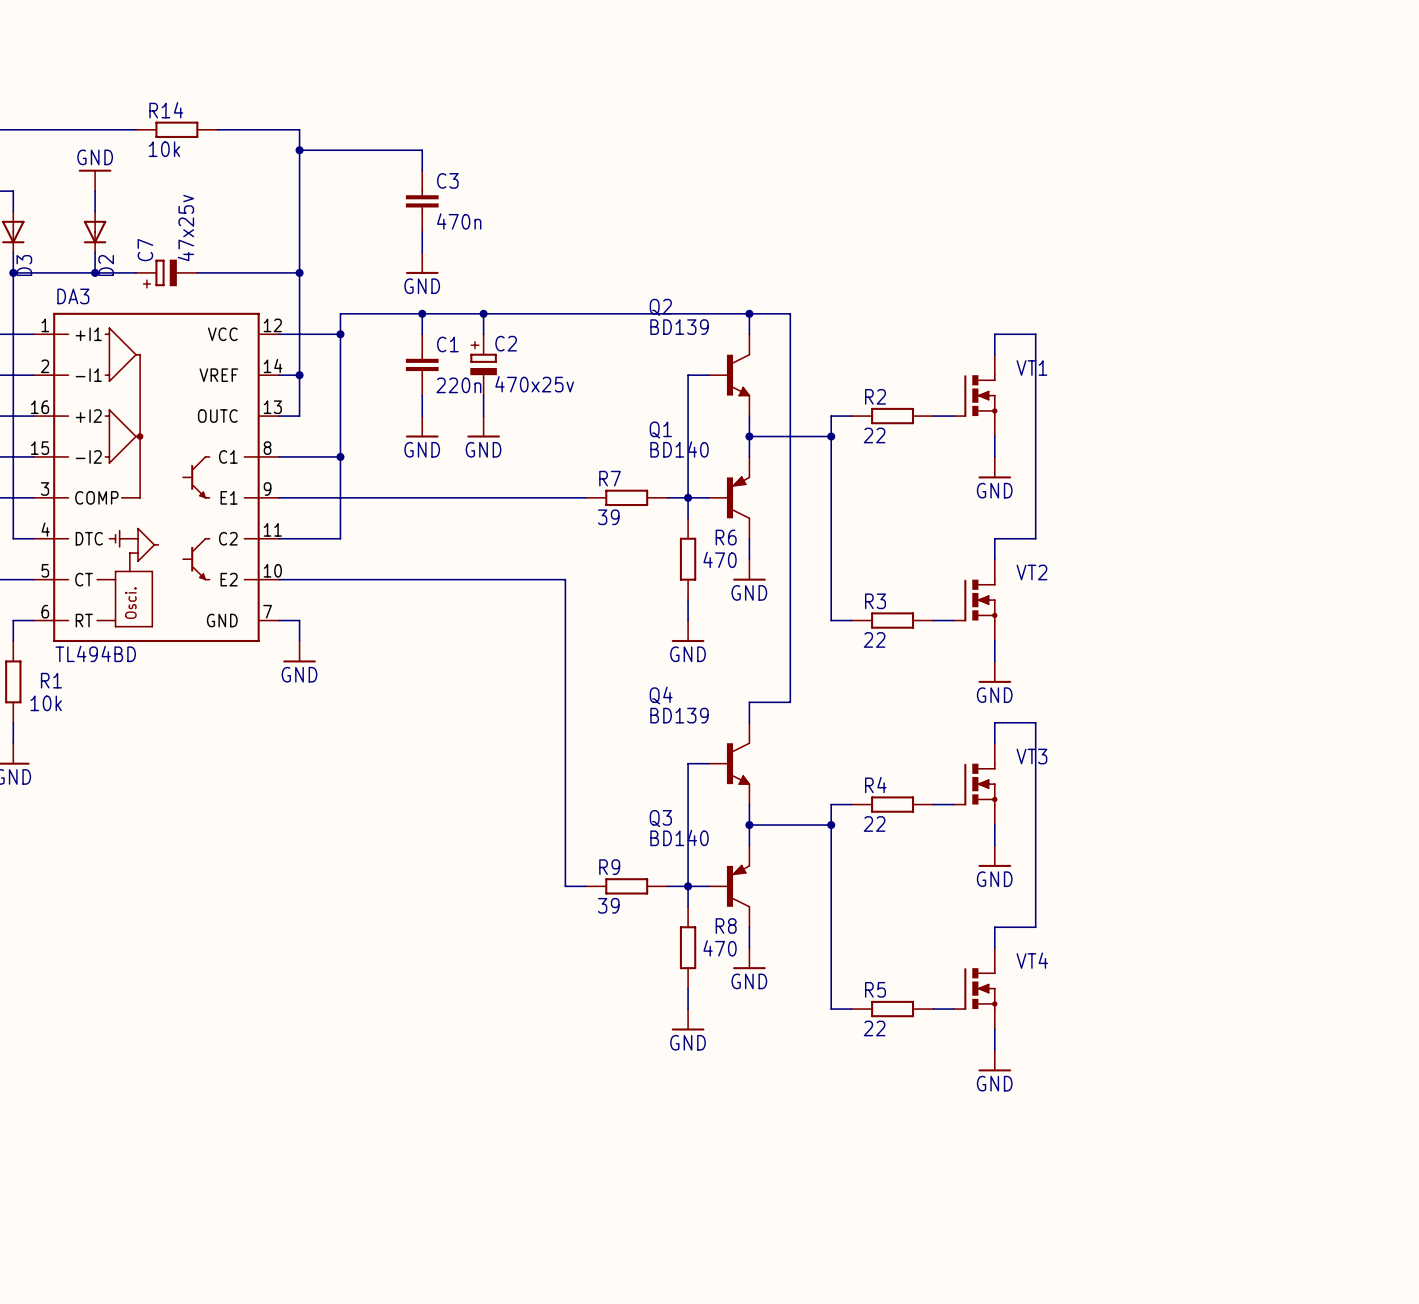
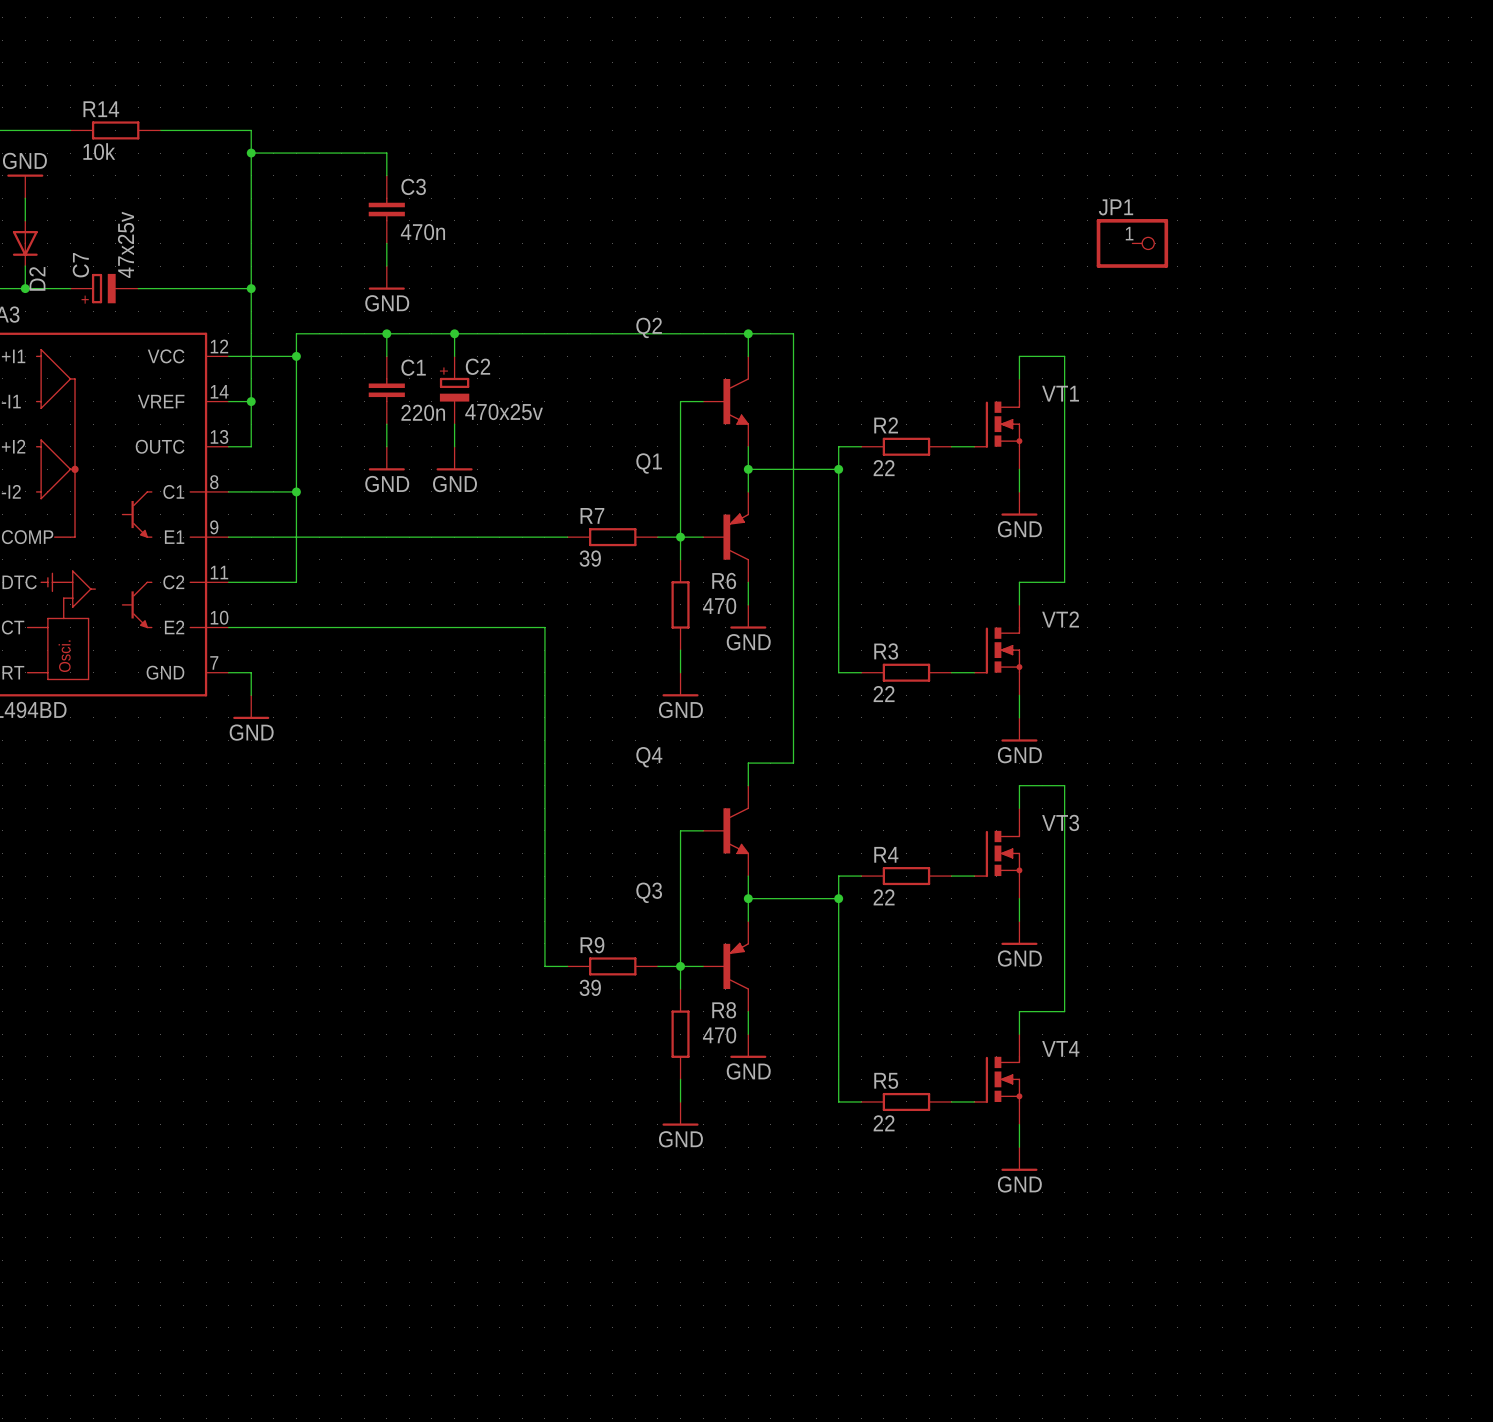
JP1: none -> (1132, 243)
Q2 value: BD139 (679, 327) -> none
Q1 value: BD140 (679, 449) -> none
Q4 value: BD139 (679, 715) -> none
Q3 value: BD140 (679, 837) -> none

